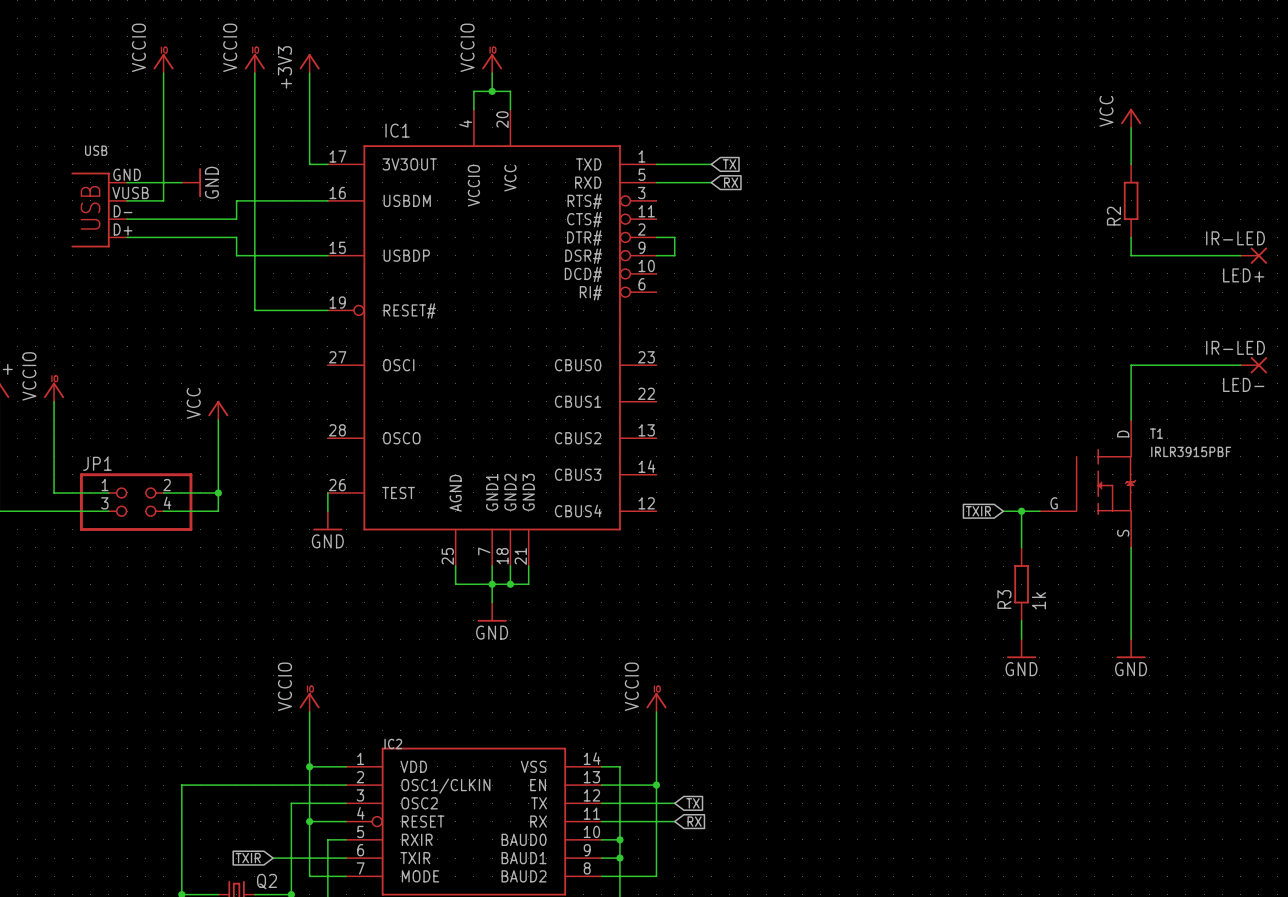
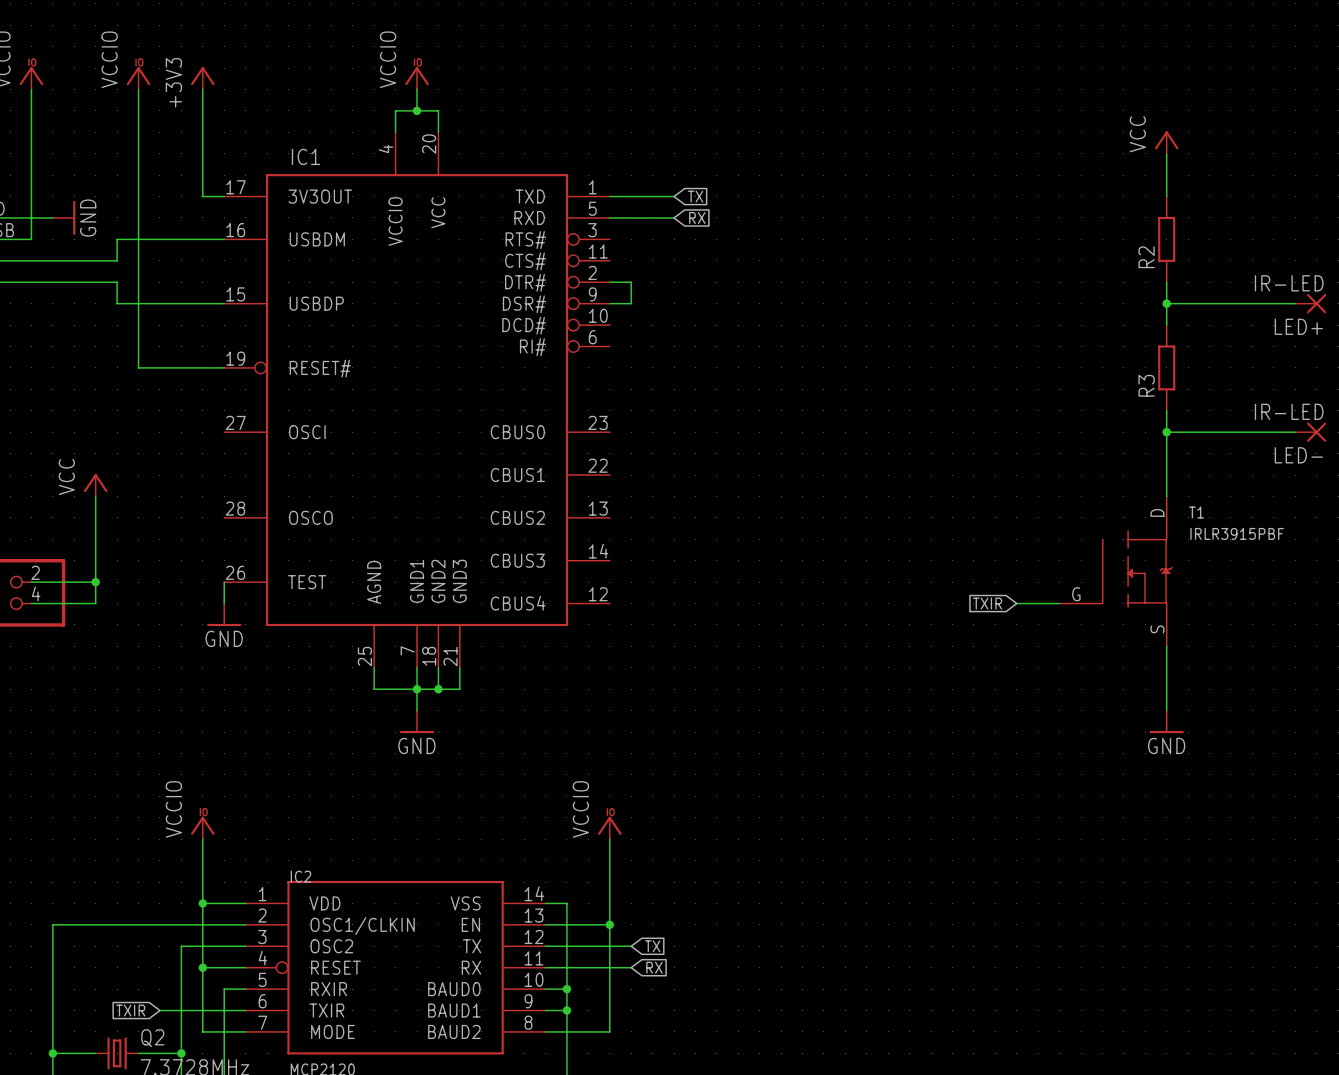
wire: none -> (1166, 303) (1166, 325)
junction: none -> (1166, 303)
wire: none -> (1166, 410) (1166, 432)
junction: none -> (1166, 432)
wire: (1021, 511) (1021, 547) -> none
junction: (1021, 511) -> none
R3 position: (1021, 584) -> (1166, 367)
R3 value: 1k (1038, 600) -> none
wire: (1021, 620) (1021, 639) -> none
power symbol: GND (1021, 648) -> none
power symbol position: GND (1131, 648) -> GND (1166, 721)

